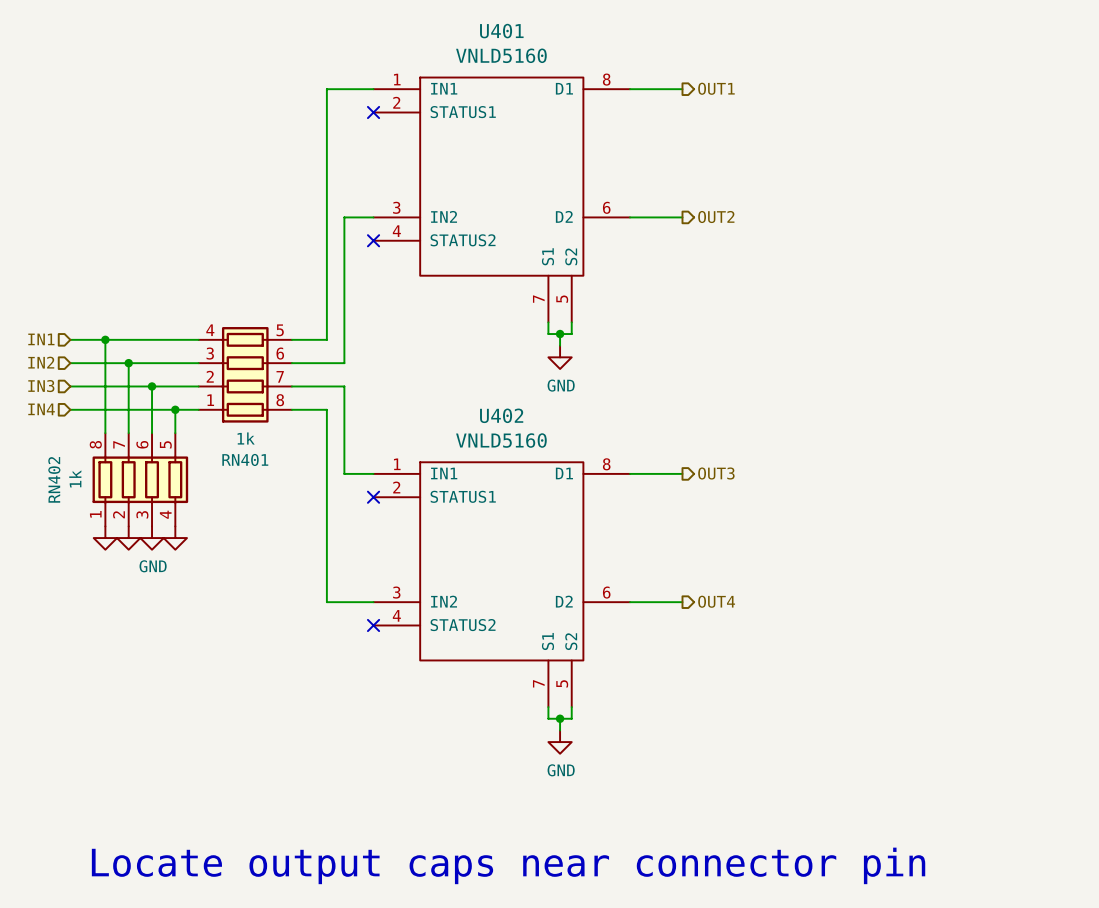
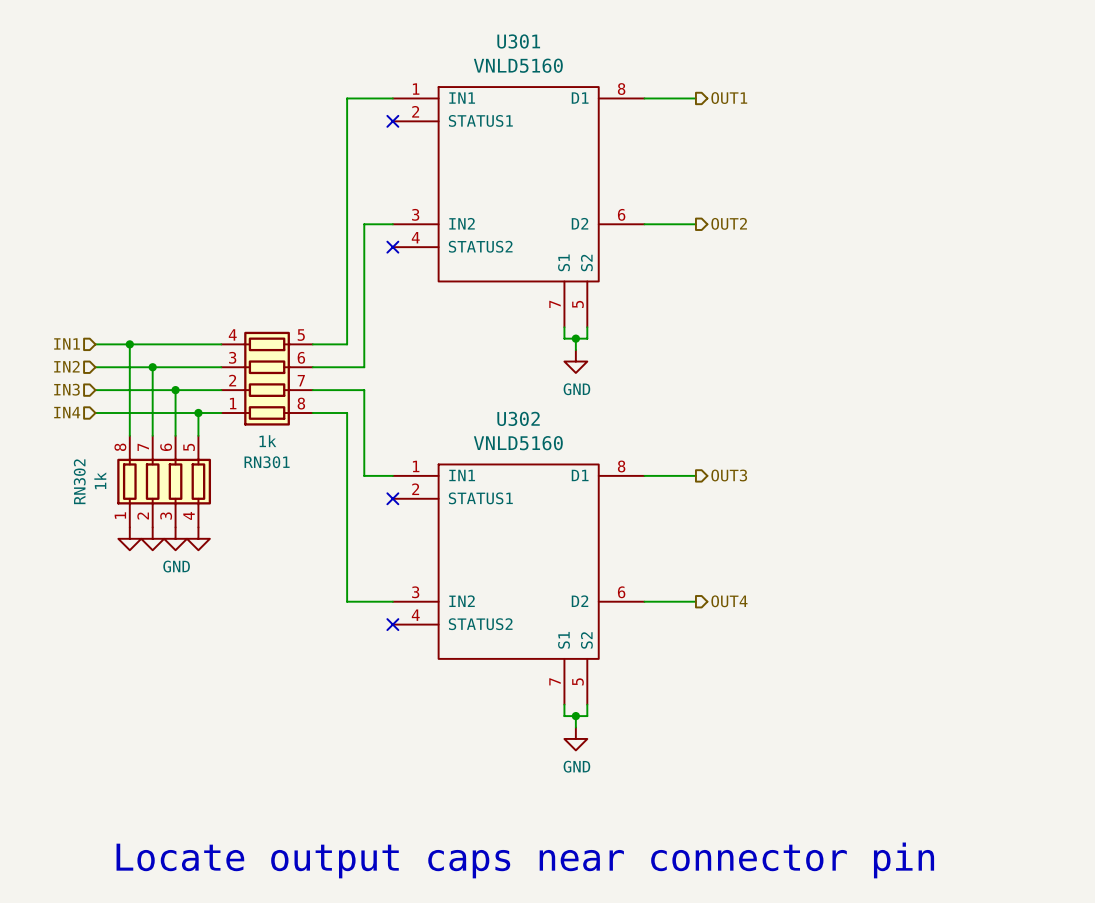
U401 name: U401 (501, 31) -> U301 (518, 41)
U402 name: U402 (501, 415) -> U302 (518, 418)
RN401 name: RN401 (245, 459) -> RN301 (267, 462)
RN402 name: RN402 (54, 479) -> RN302 (79, 481)

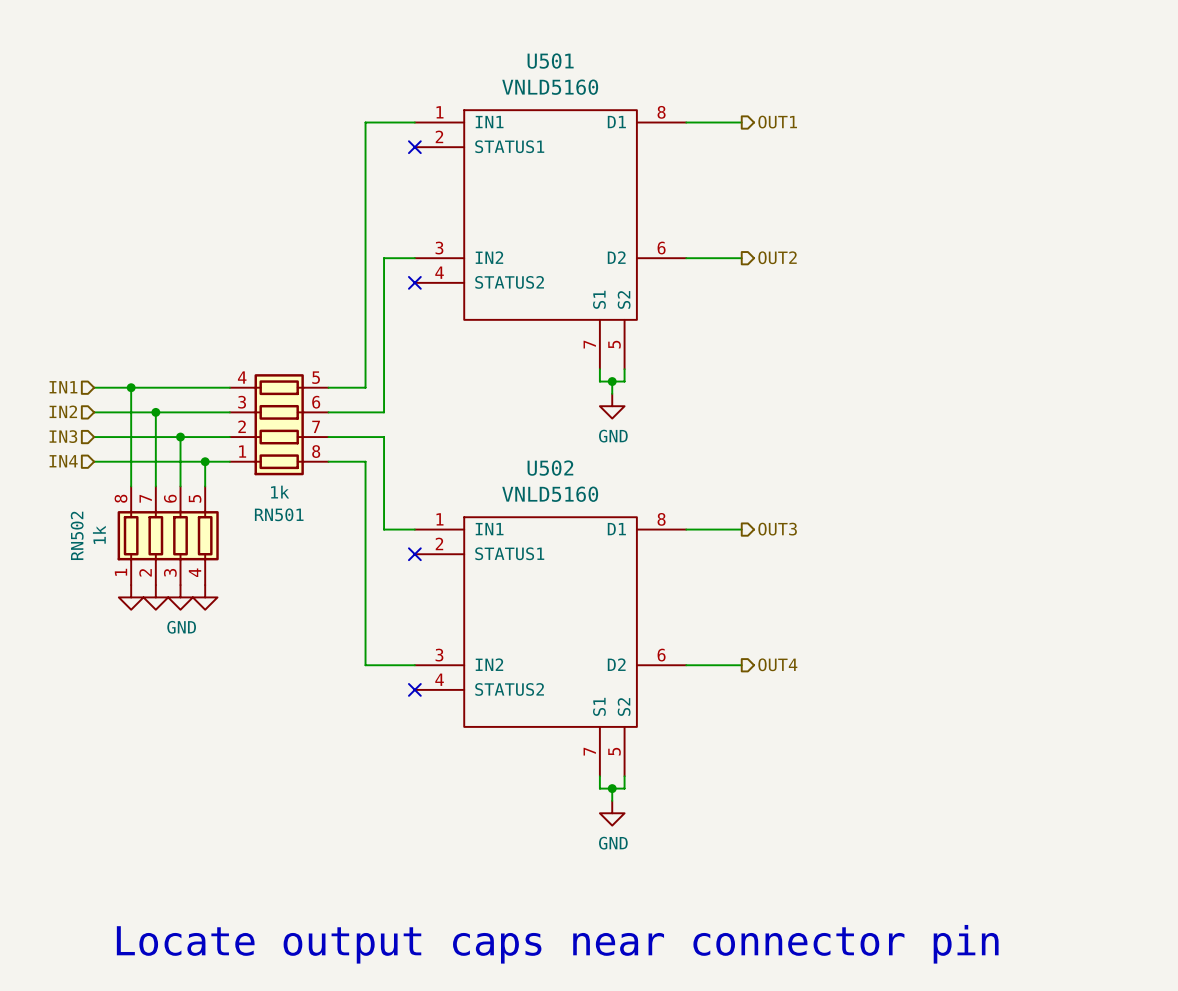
U301 name: U301 (518, 41) -> U501 (550, 61)
U302 name: U302 (518, 418) -> U502 (550, 468)
RN301 name: RN301 (267, 462) -> RN501 (279, 514)
RN302 name: RN302 (79, 481) -> RN502 (77, 535)

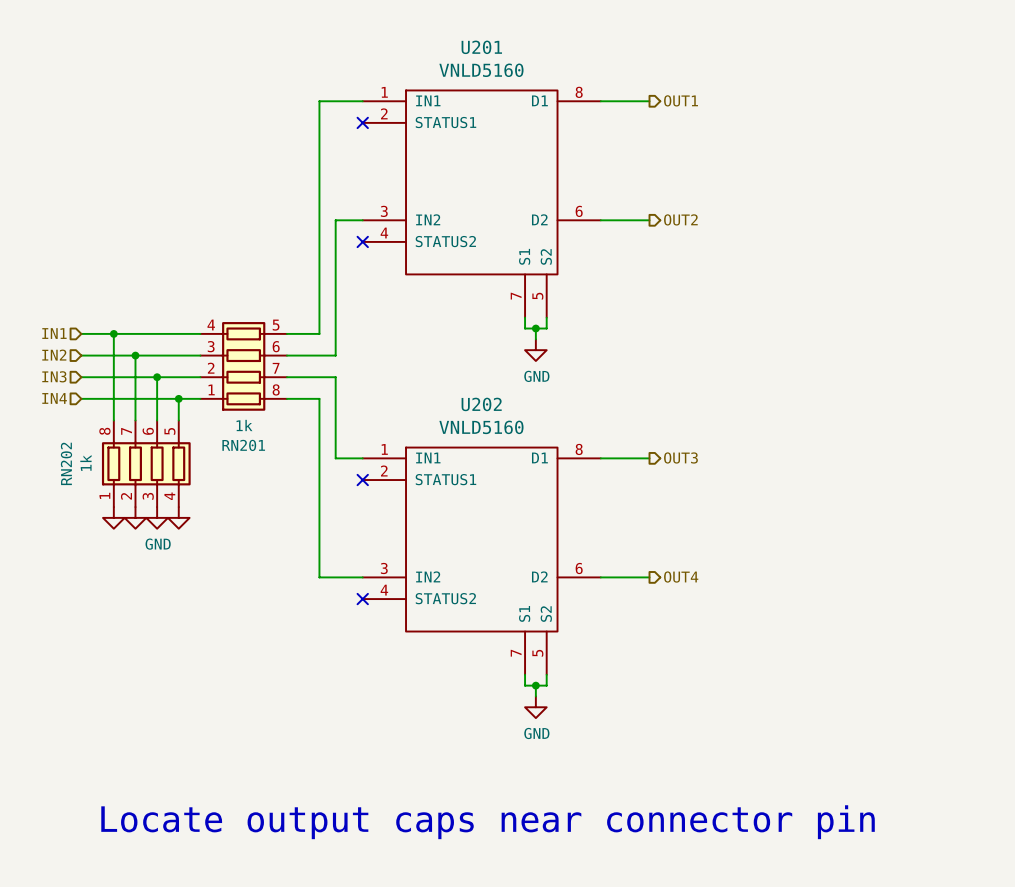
U501 name: U501 (550, 61) -> U201 (481, 47)
U502 name: U502 (550, 468) -> U202 (481, 404)
RN501 name: RN501 (279, 514) -> RN201 (243, 445)
RN502 name: RN502 (77, 535) -> RN202 (66, 463)

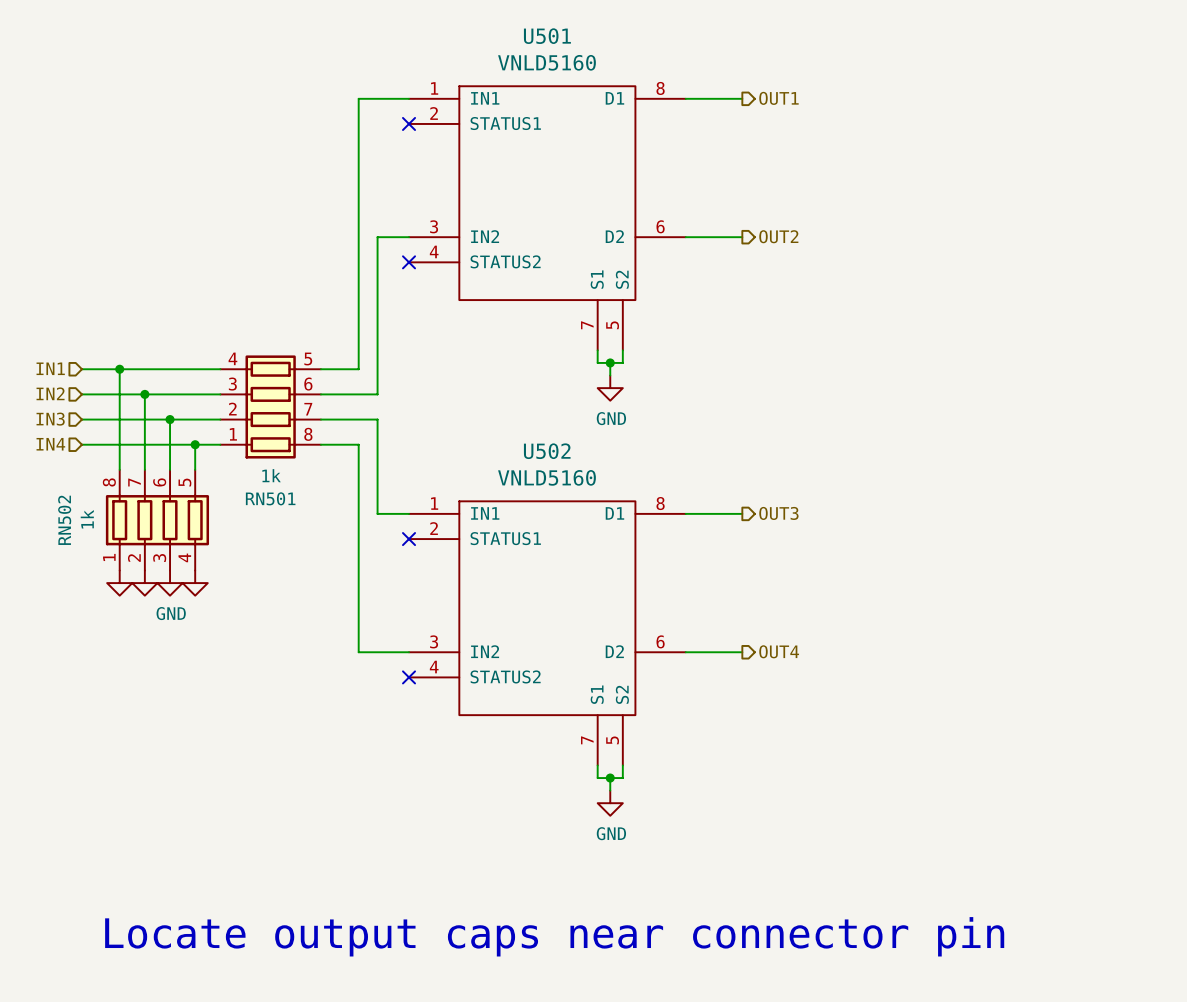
U201 name: U201 (481, 47) -> U501 (547, 36)
U202 name: U202 (481, 404) -> U502 (547, 451)
RN201 name: RN201 (243, 445) -> RN501 (270, 498)
RN202 name: RN202 (66, 463) -> RN502 (64, 520)

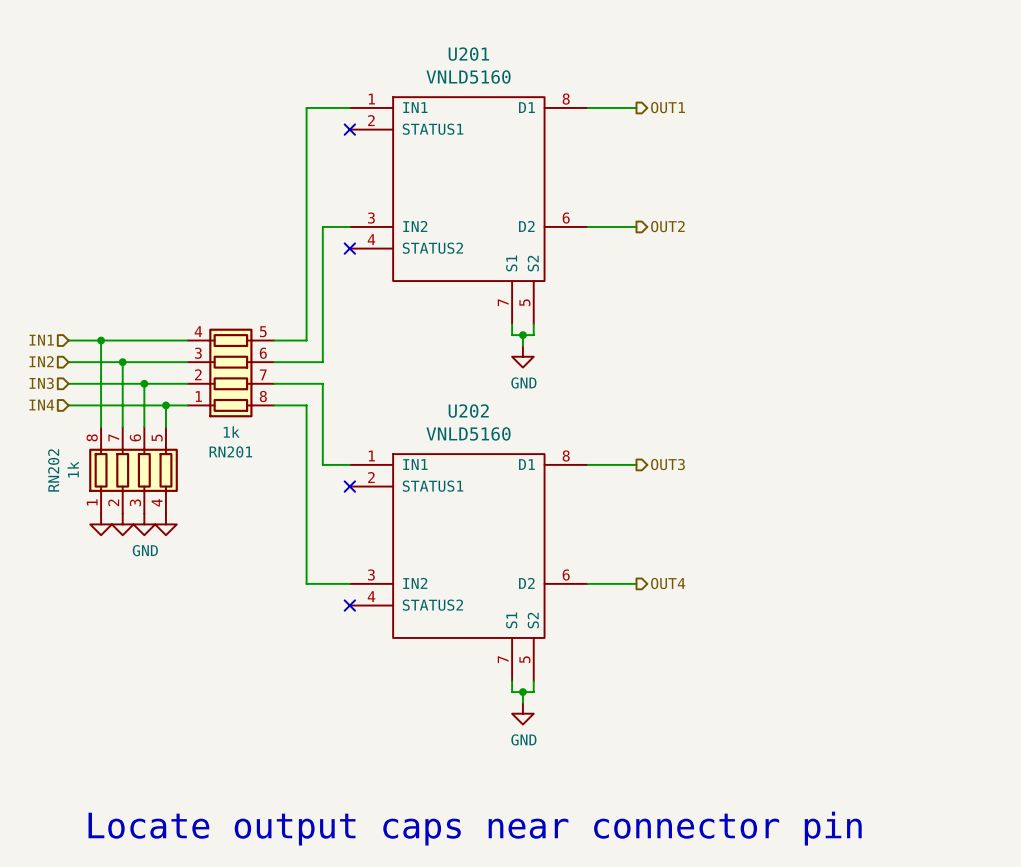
U501 name: U501 (547, 36) -> U201 (468, 54)
U502 name: U502 (547, 451) -> U202 (468, 411)
RN501 name: RN501 (270, 498) -> RN201 (230, 451)
RN502 name: RN502 (64, 520) -> RN202 (53, 470)

